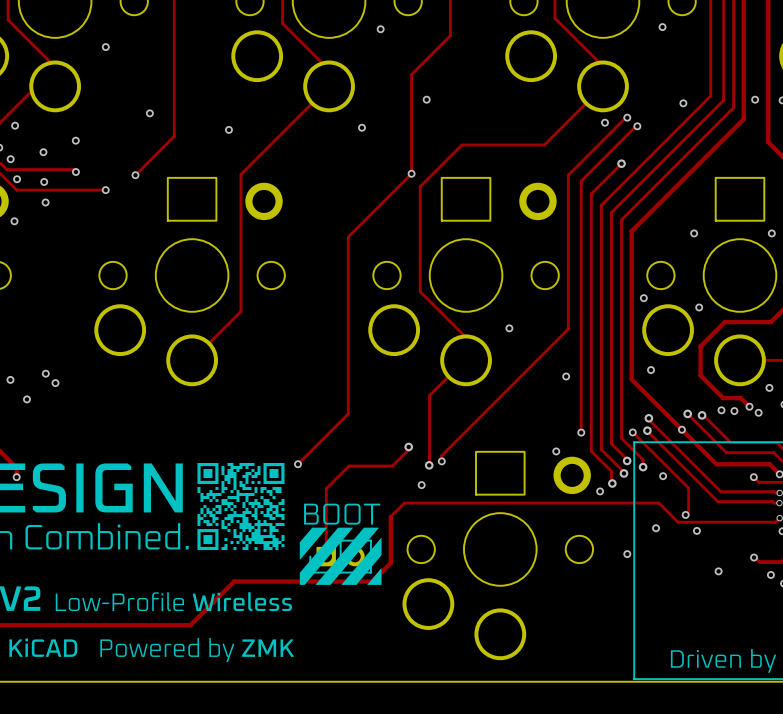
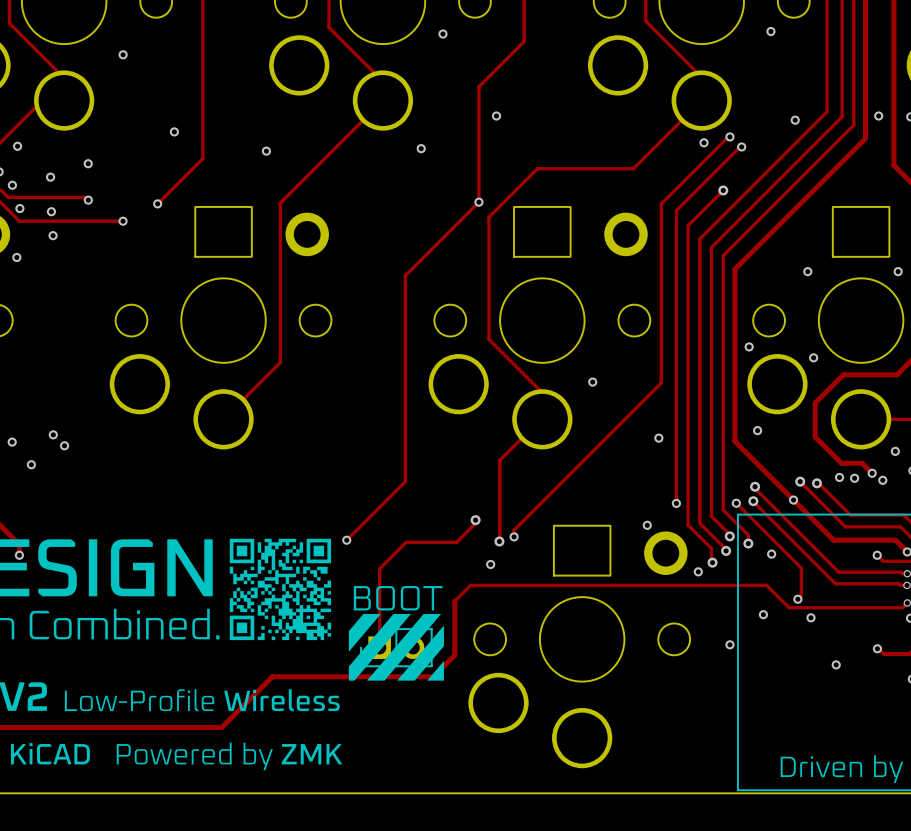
via: (770, 574) -> none

